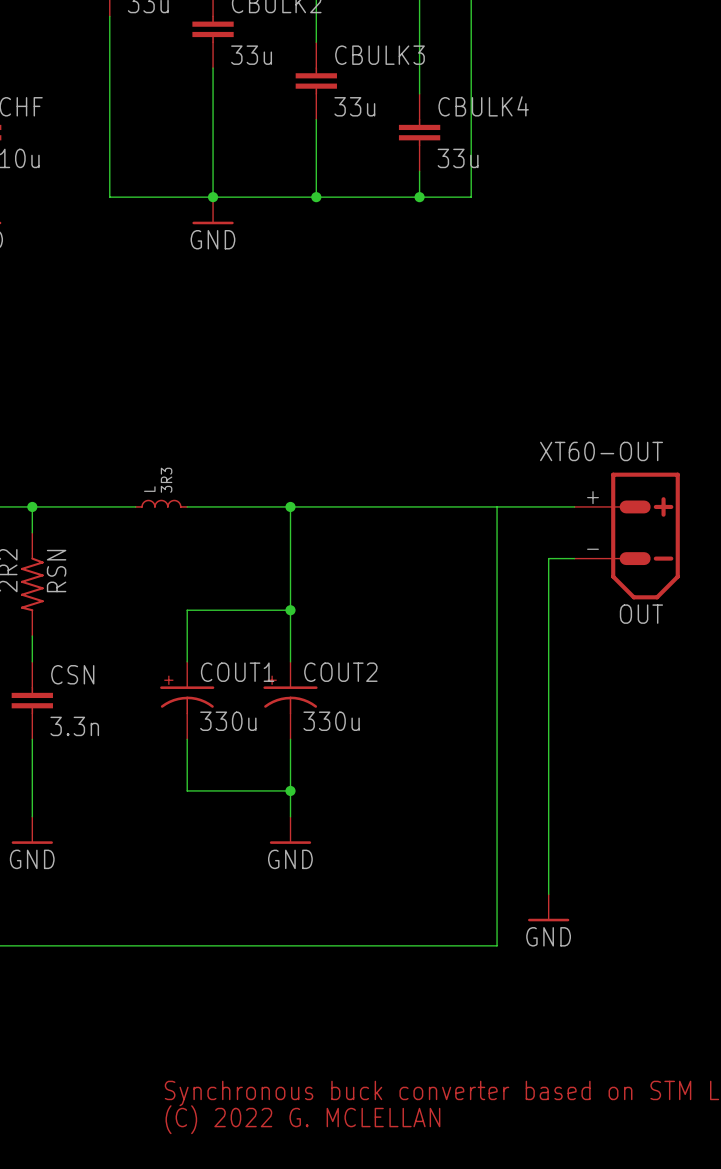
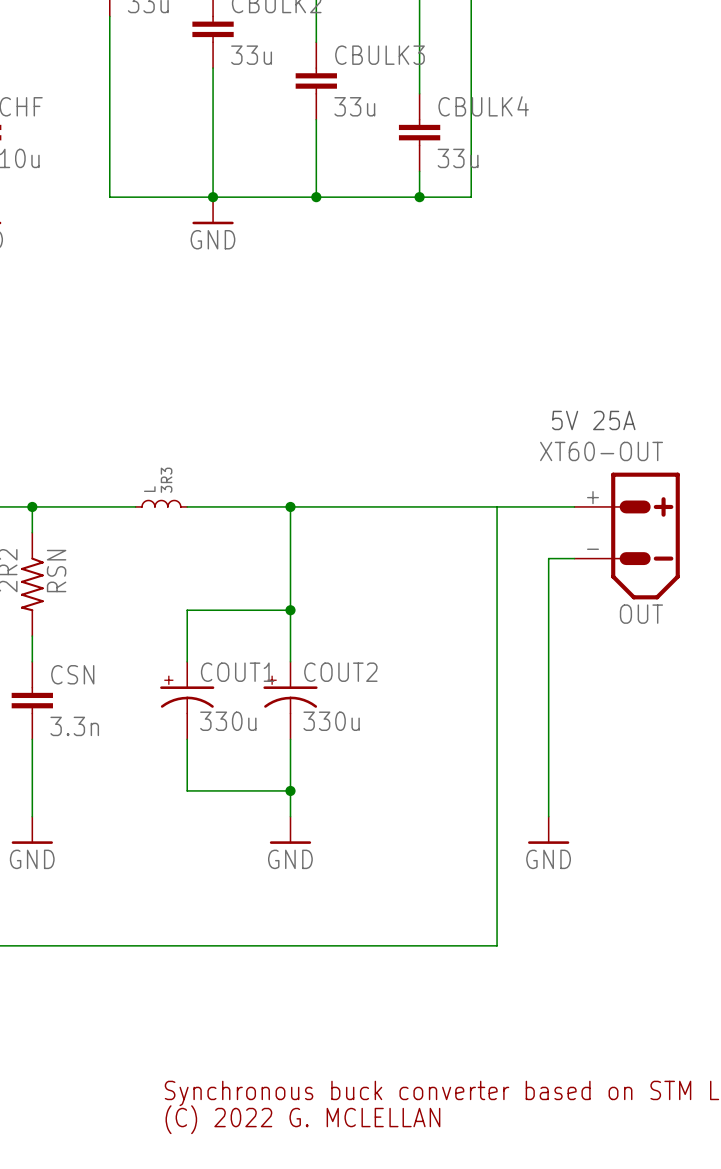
text: none -> 5V 25A (593, 420)
wire: (548, 816) (548, 894) -> none
power symbol position: GND (548, 907) -> GND (548, 830)

